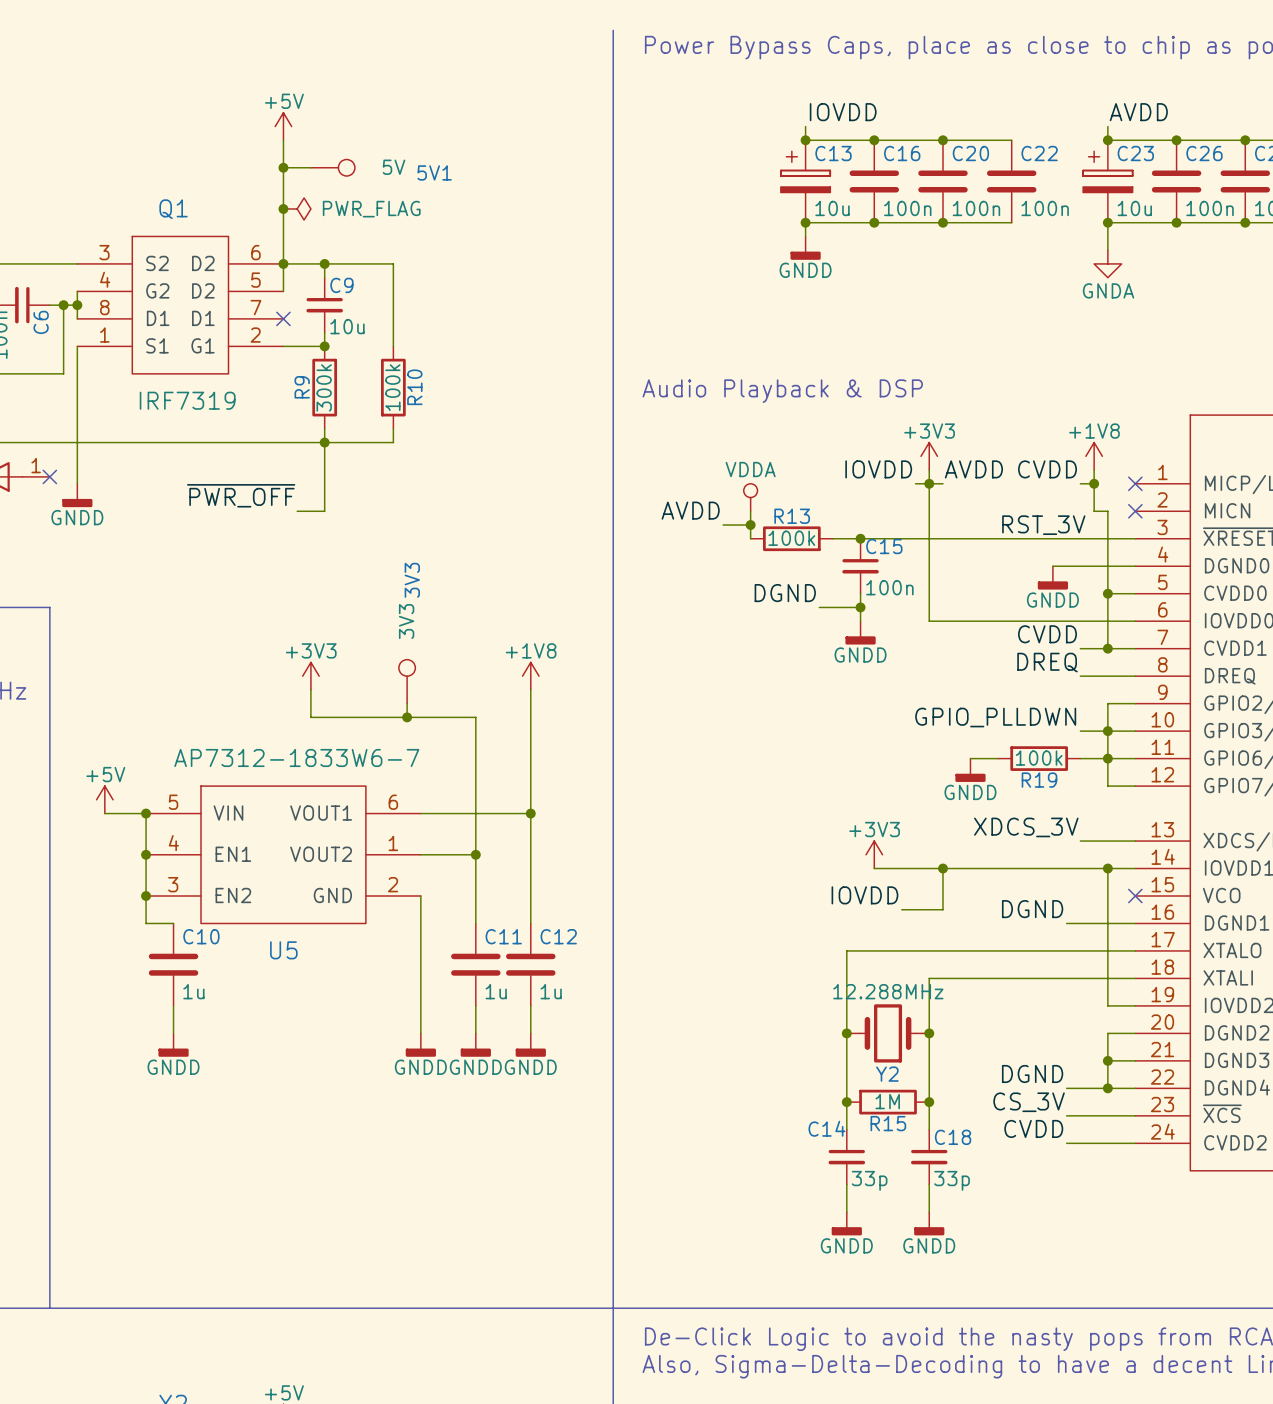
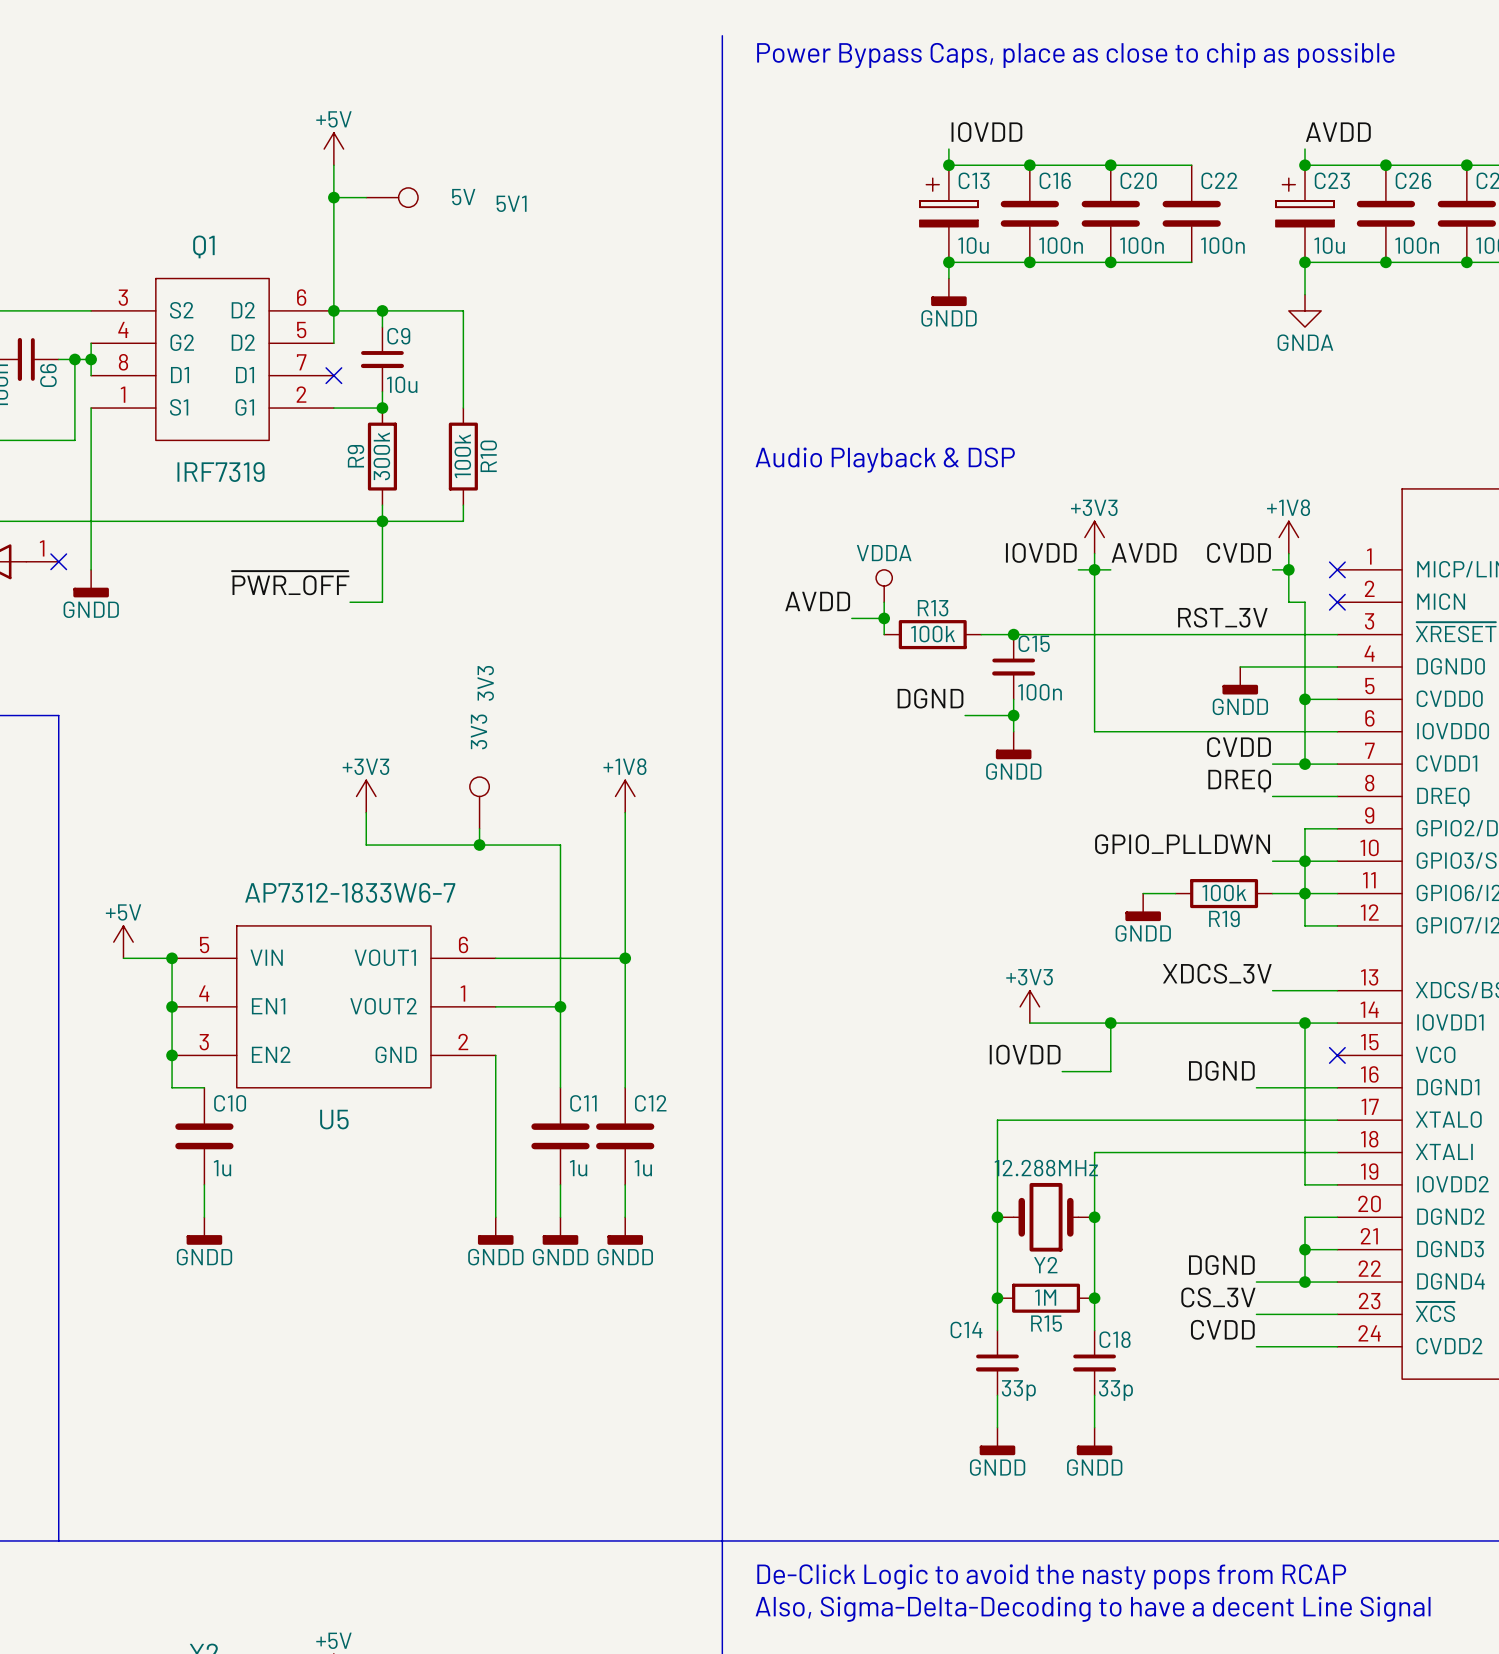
junction: (283, 208) -> none
power symbol: PWR_FLAG (297, 208) -> none

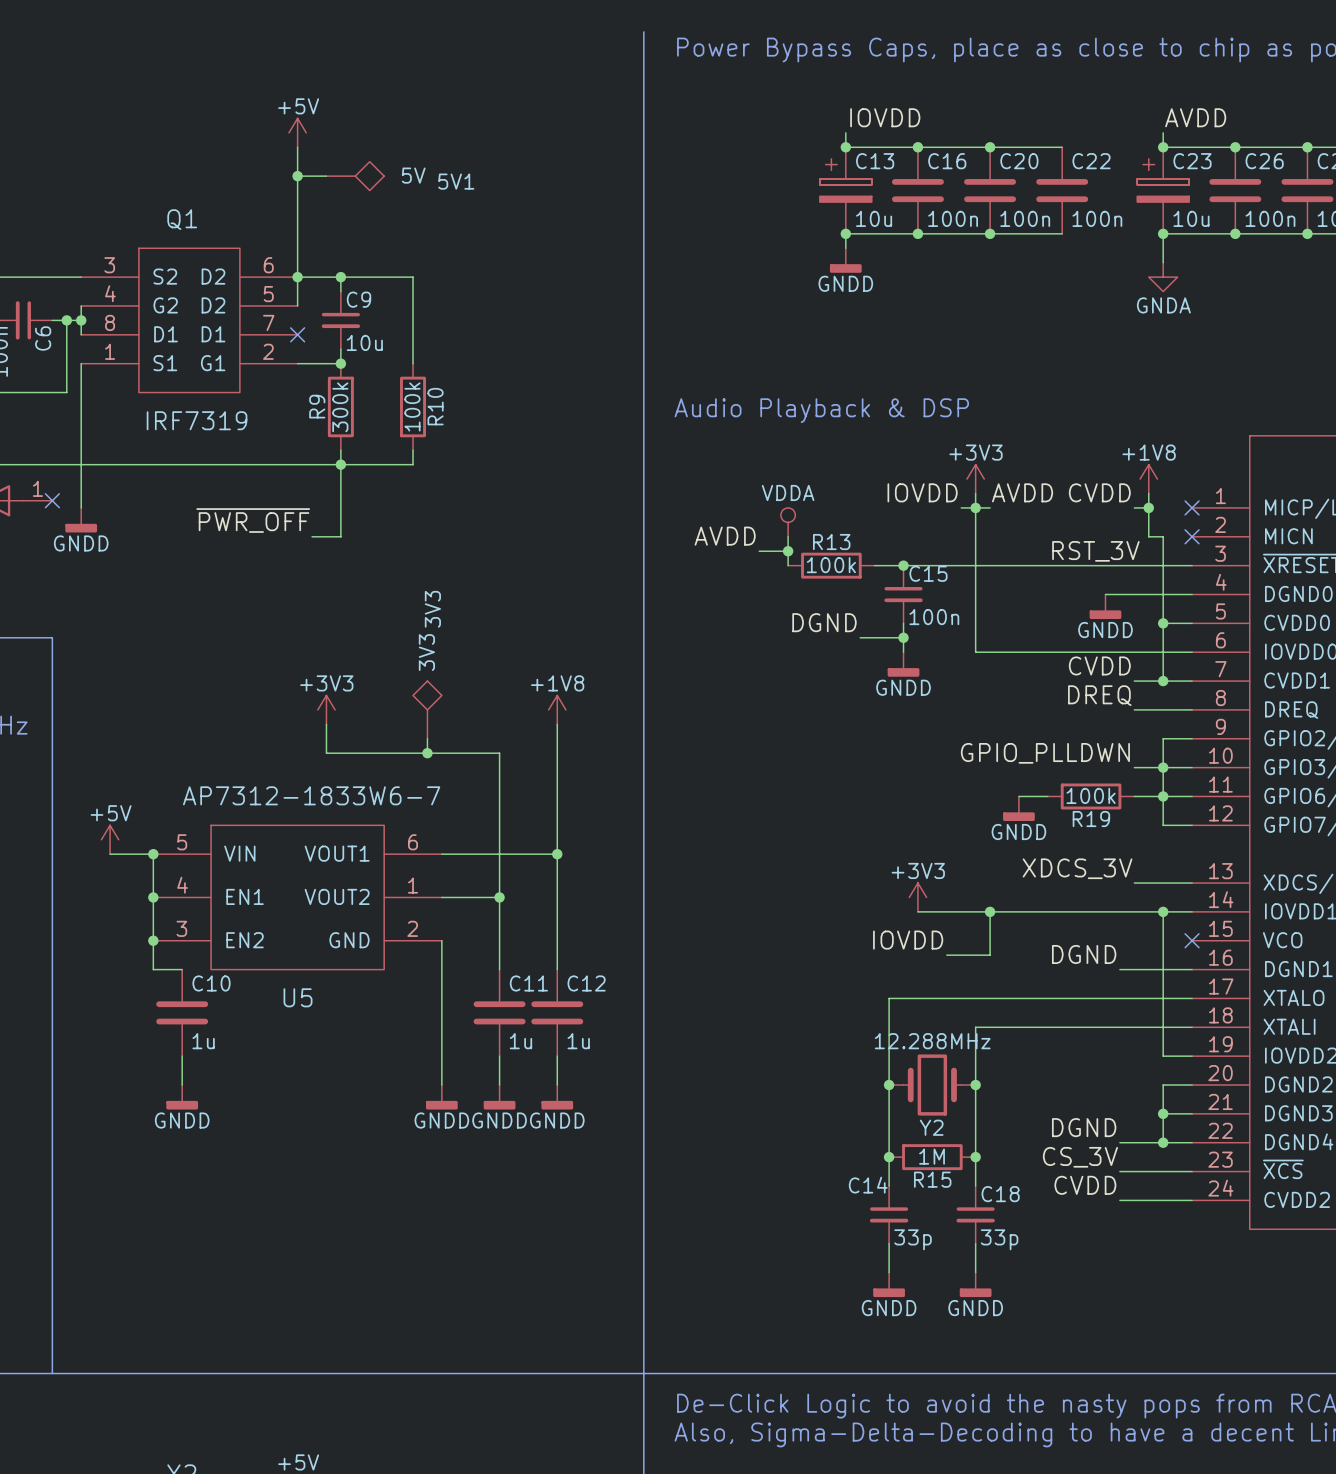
5V1 symbol: [366, 187, 419, 208] -> [326, 161, 385, 191]
3V3 symbol: [469, 777, 490, 829] -> [413, 681, 442, 739]

